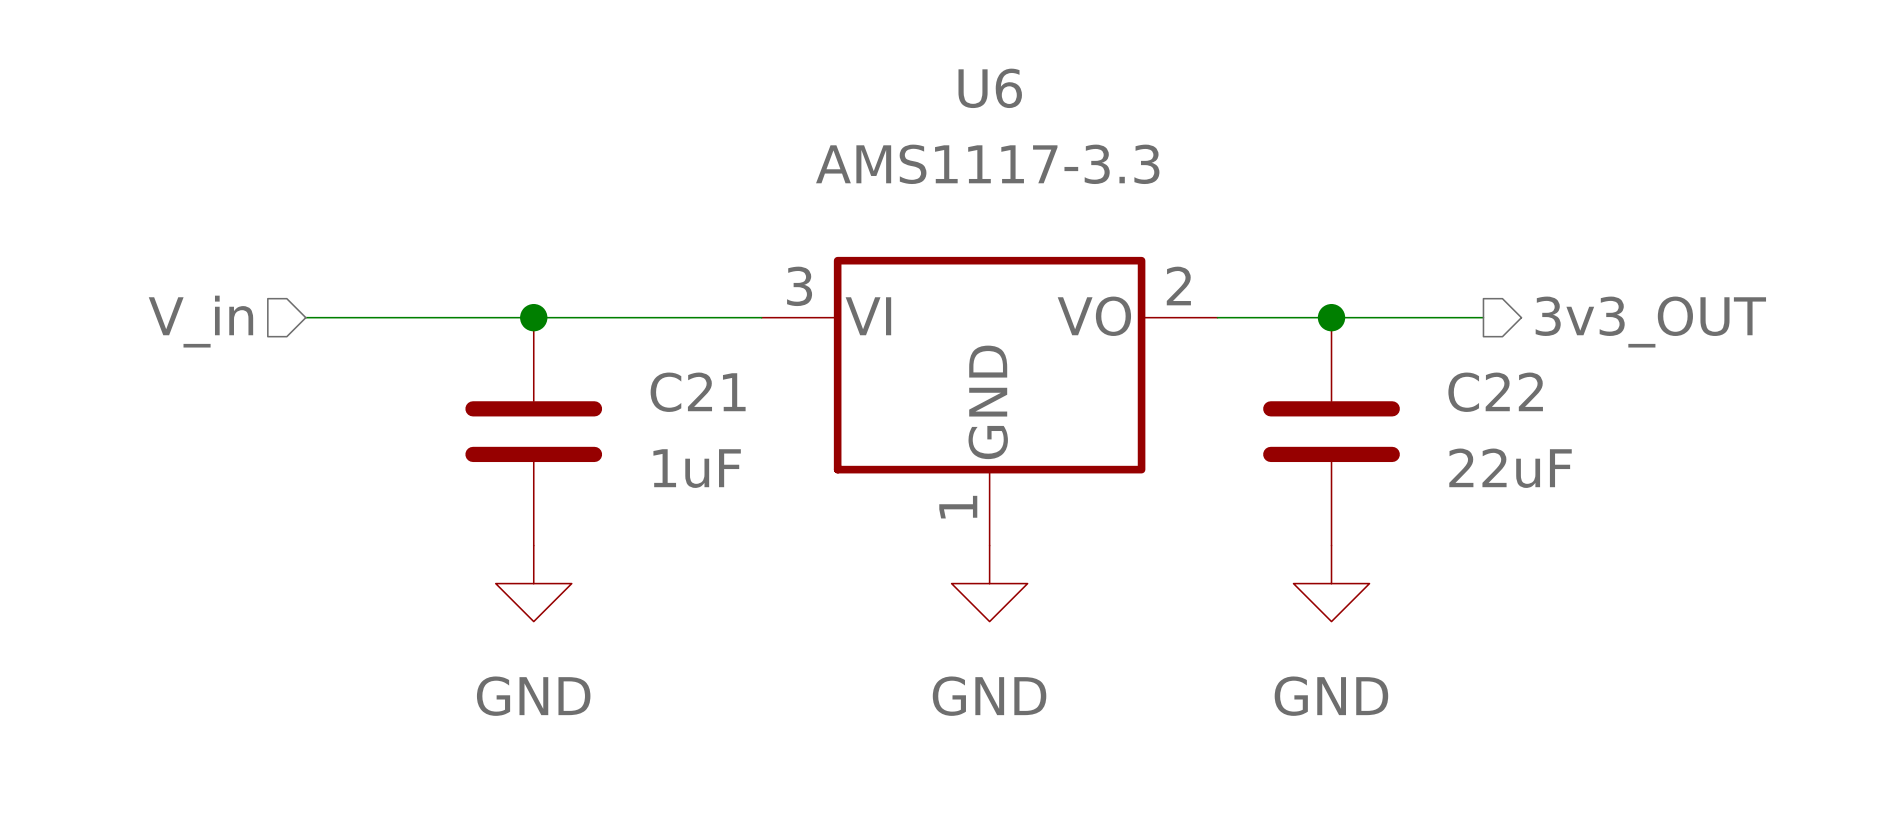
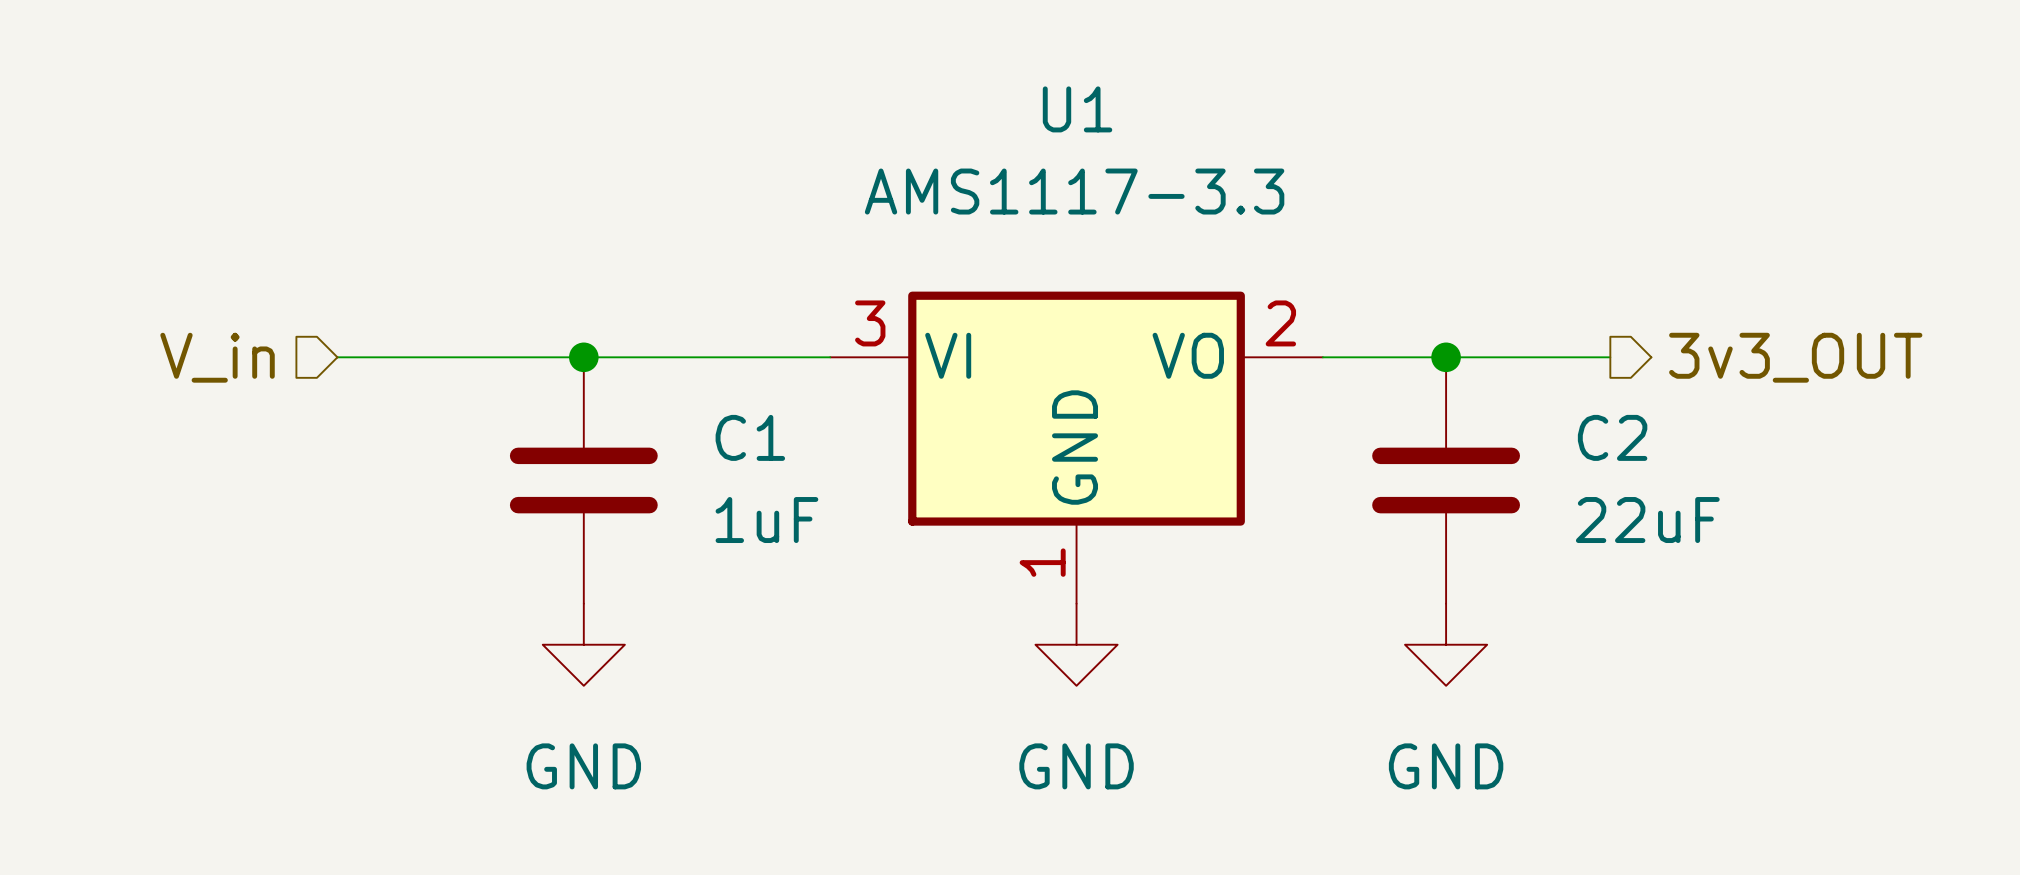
U6 name: U6 (990, 88) -> U1 (1077, 109)
C21 name: C21 (698, 392) -> C1 (750, 437)
C22 name: C22 (1495, 392) -> C2 (1612, 437)

